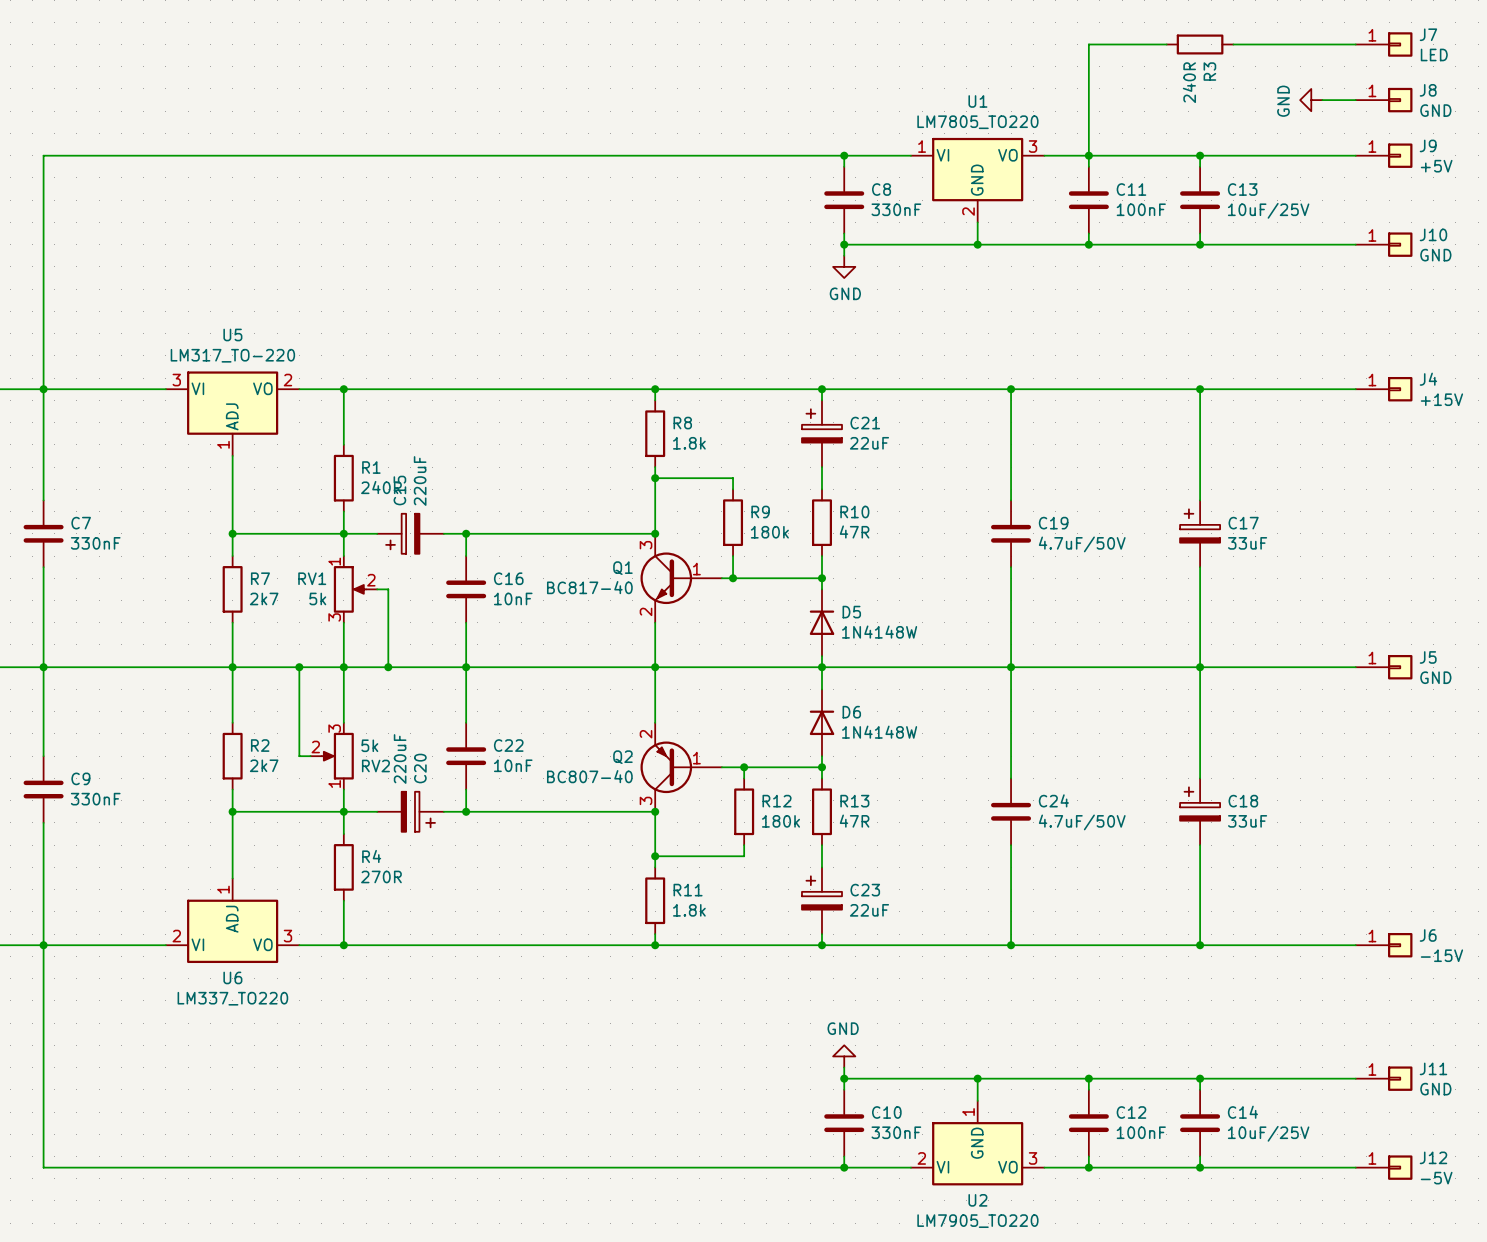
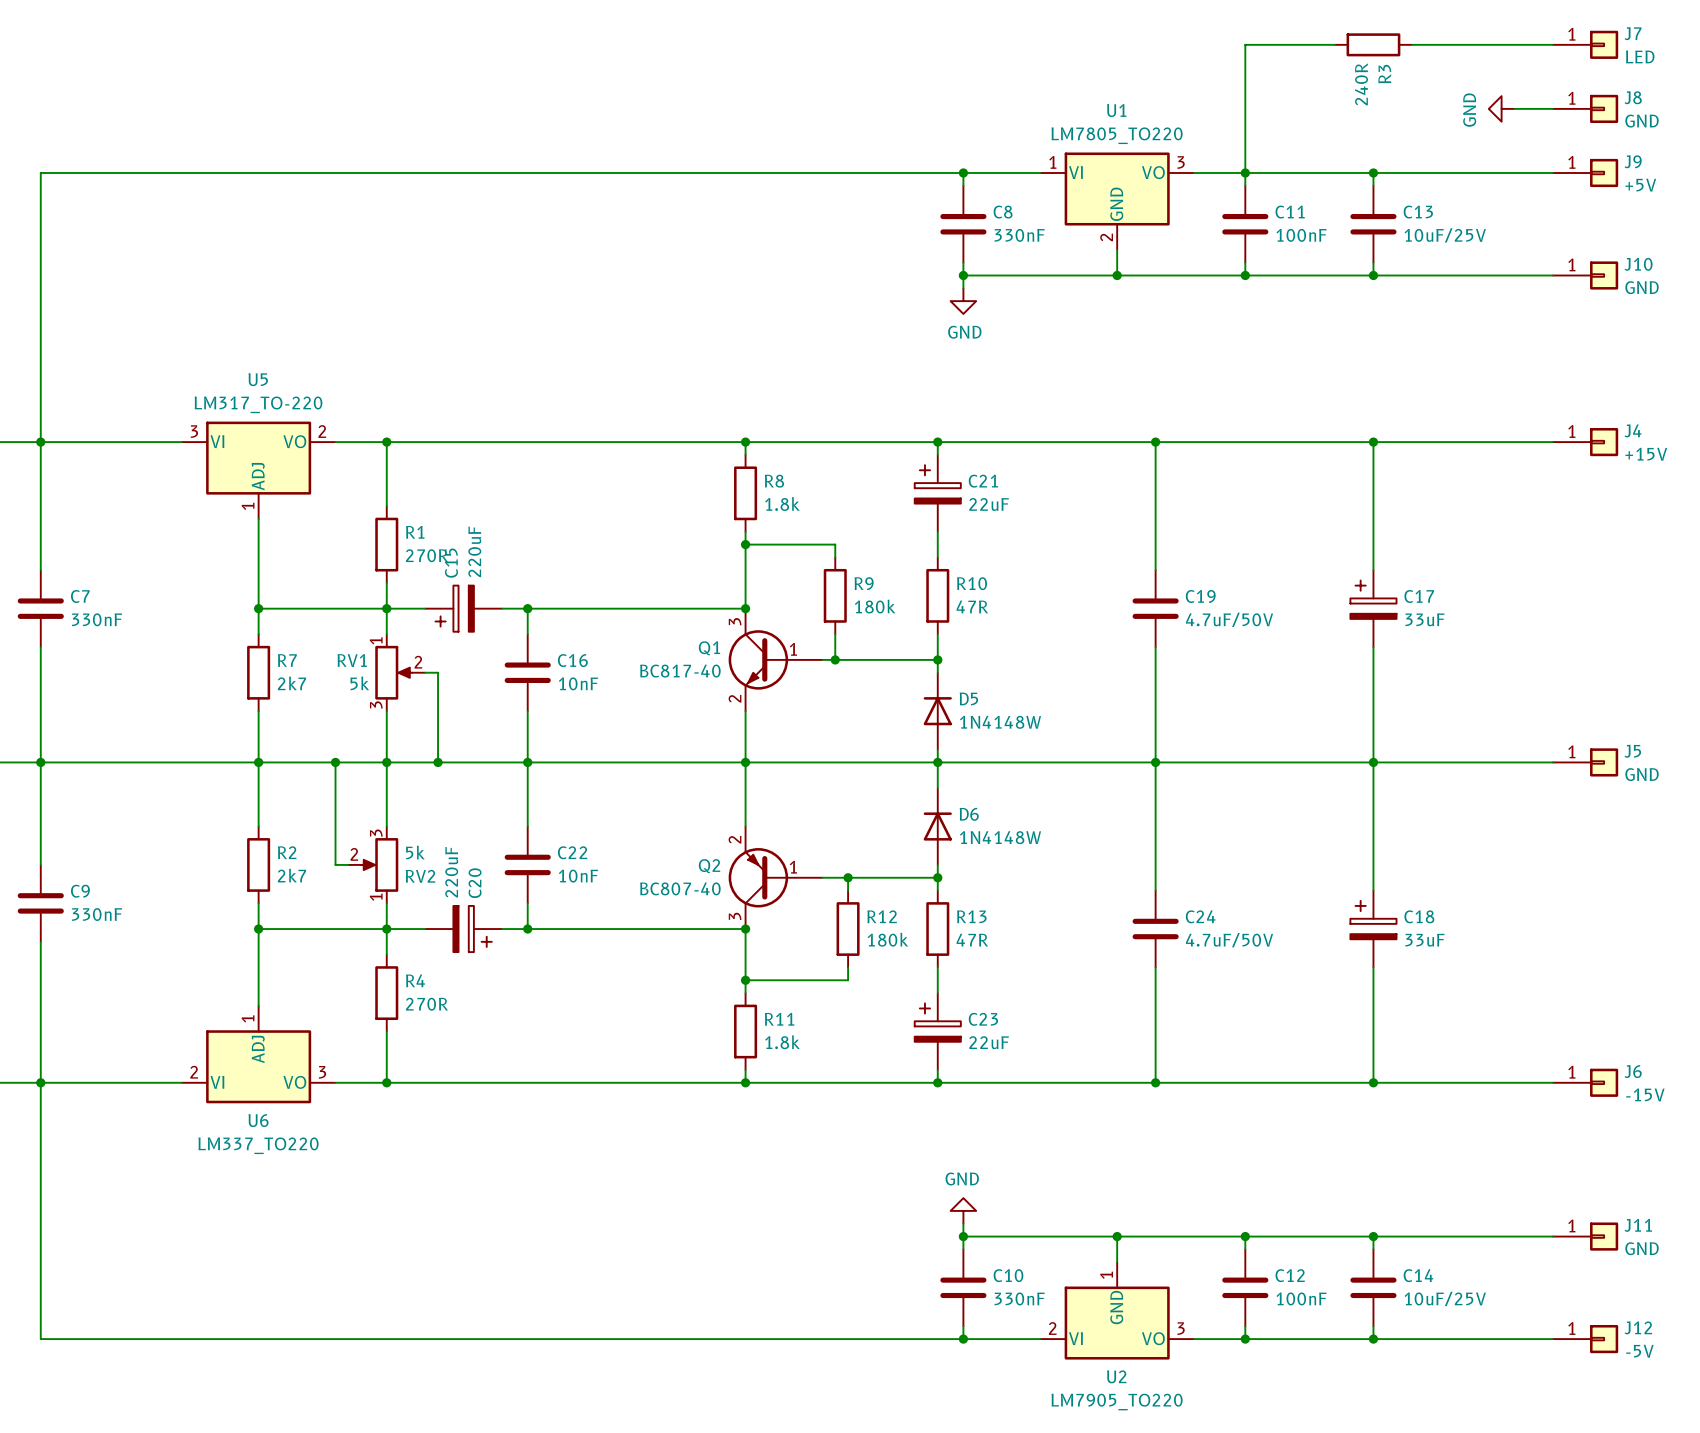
R1 value: 240R (381, 487) -> 270R (426, 555)

